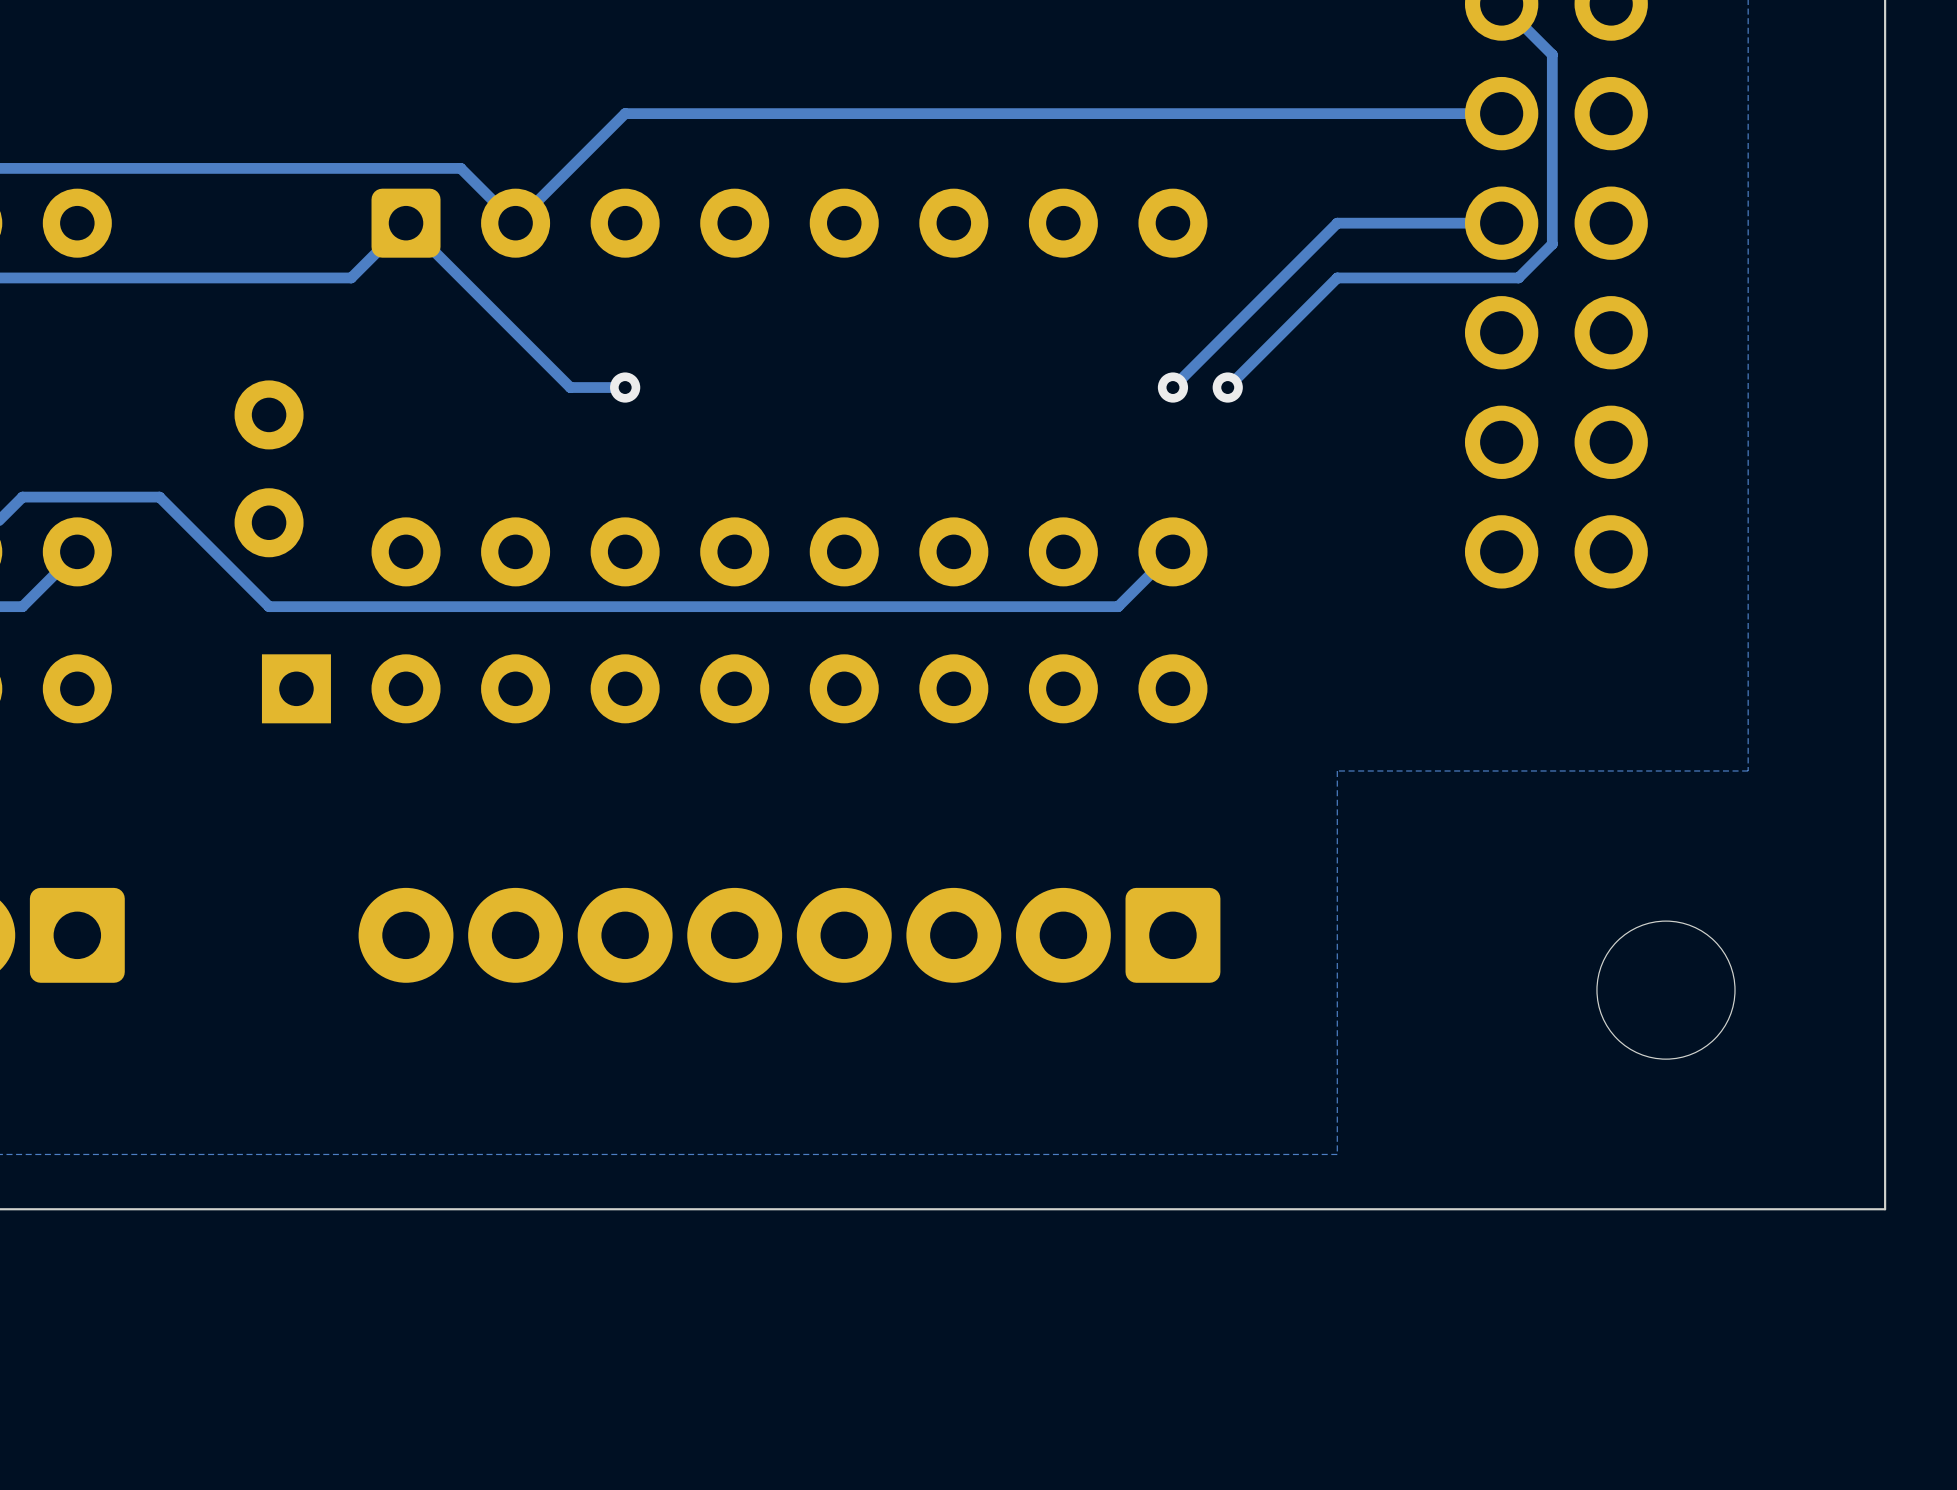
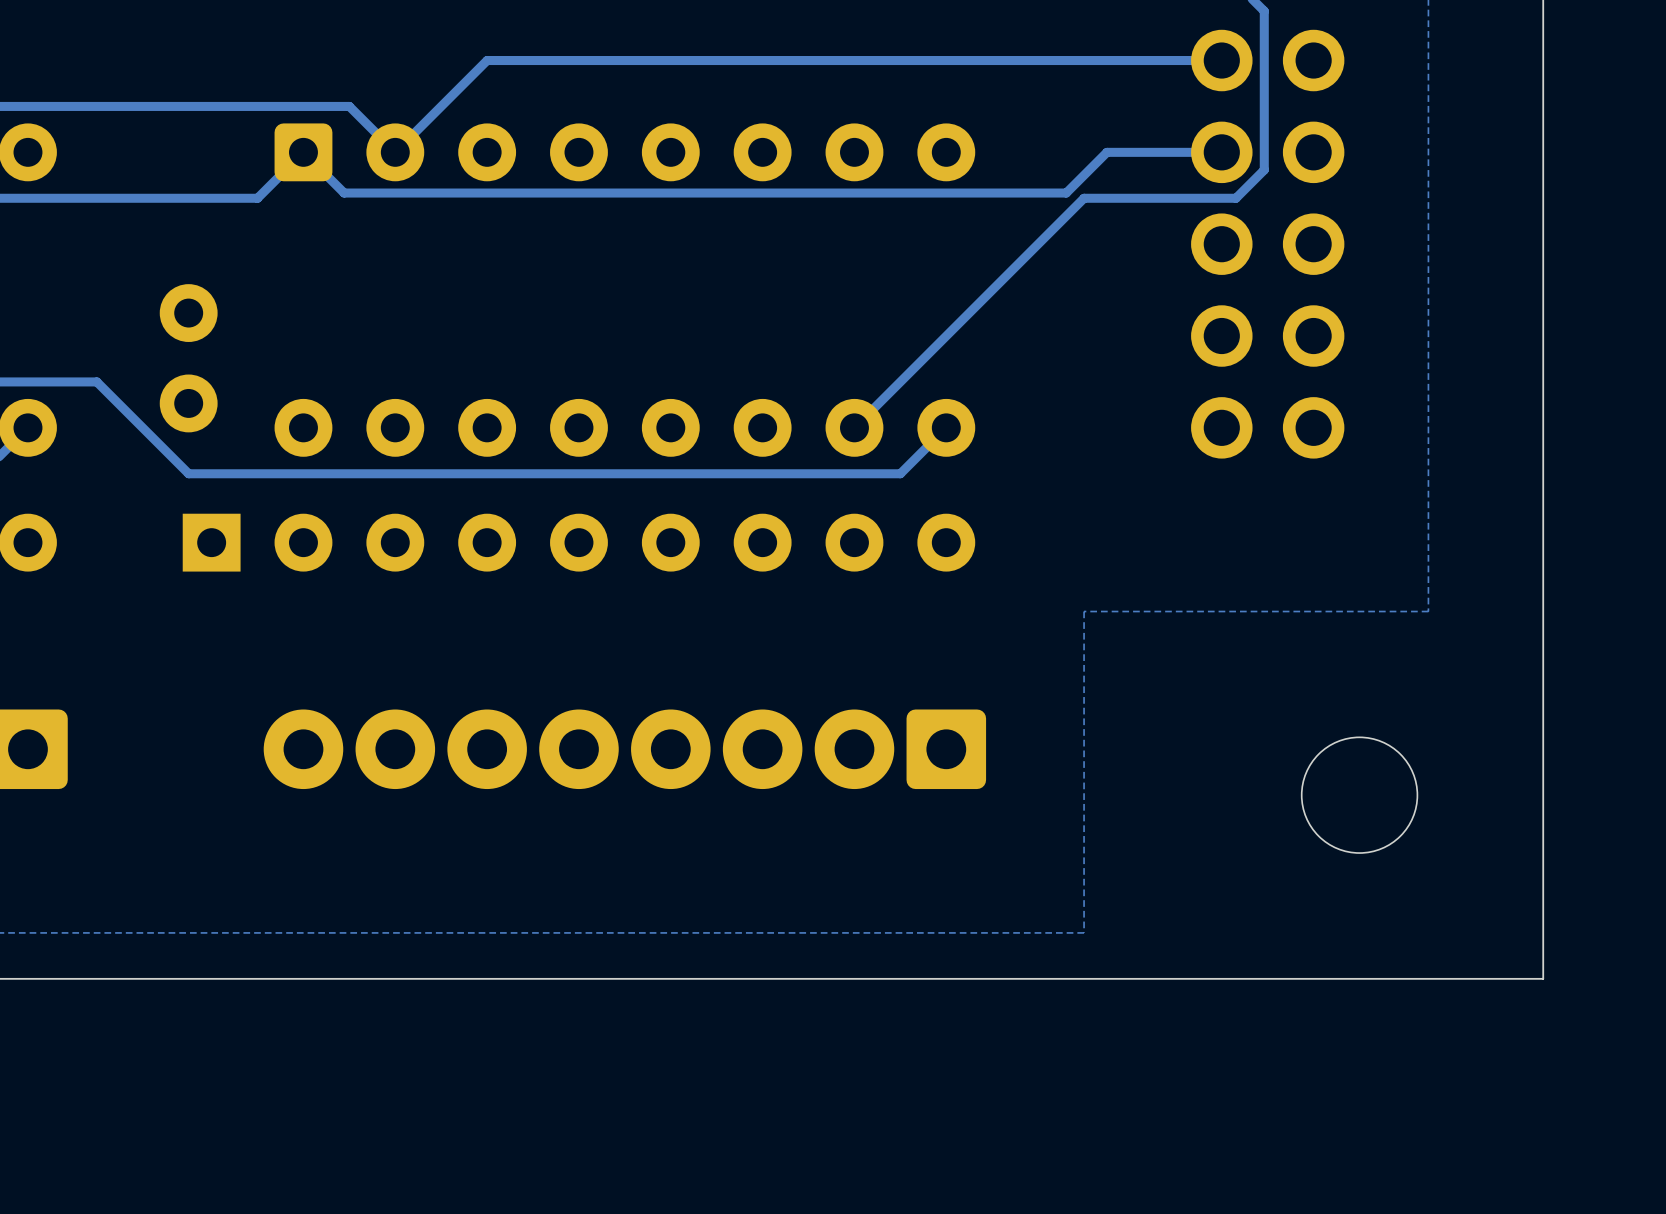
track: (1364, 223) (1337, 223) (1172, 387) -> (1106, 152) (1066, 193) (344, 193)
track: (454, 271) (570, 387) (625, 387) -> none
via: (625, 387) -> none
via: (1172, 387) -> none
track: none -> (992, 290) (854, 427)
via: (1227, 387) -> none

